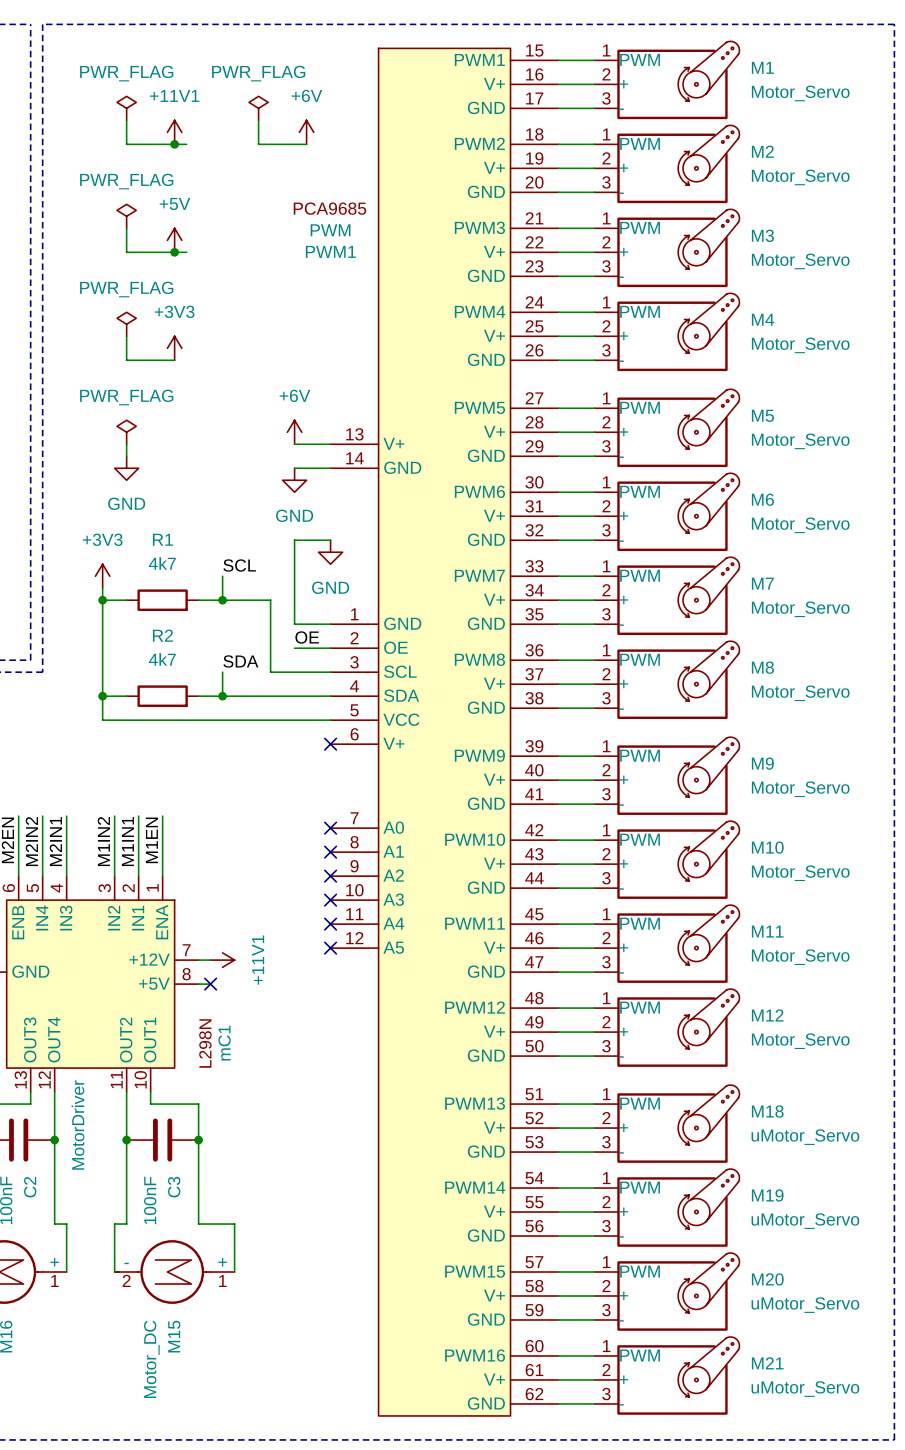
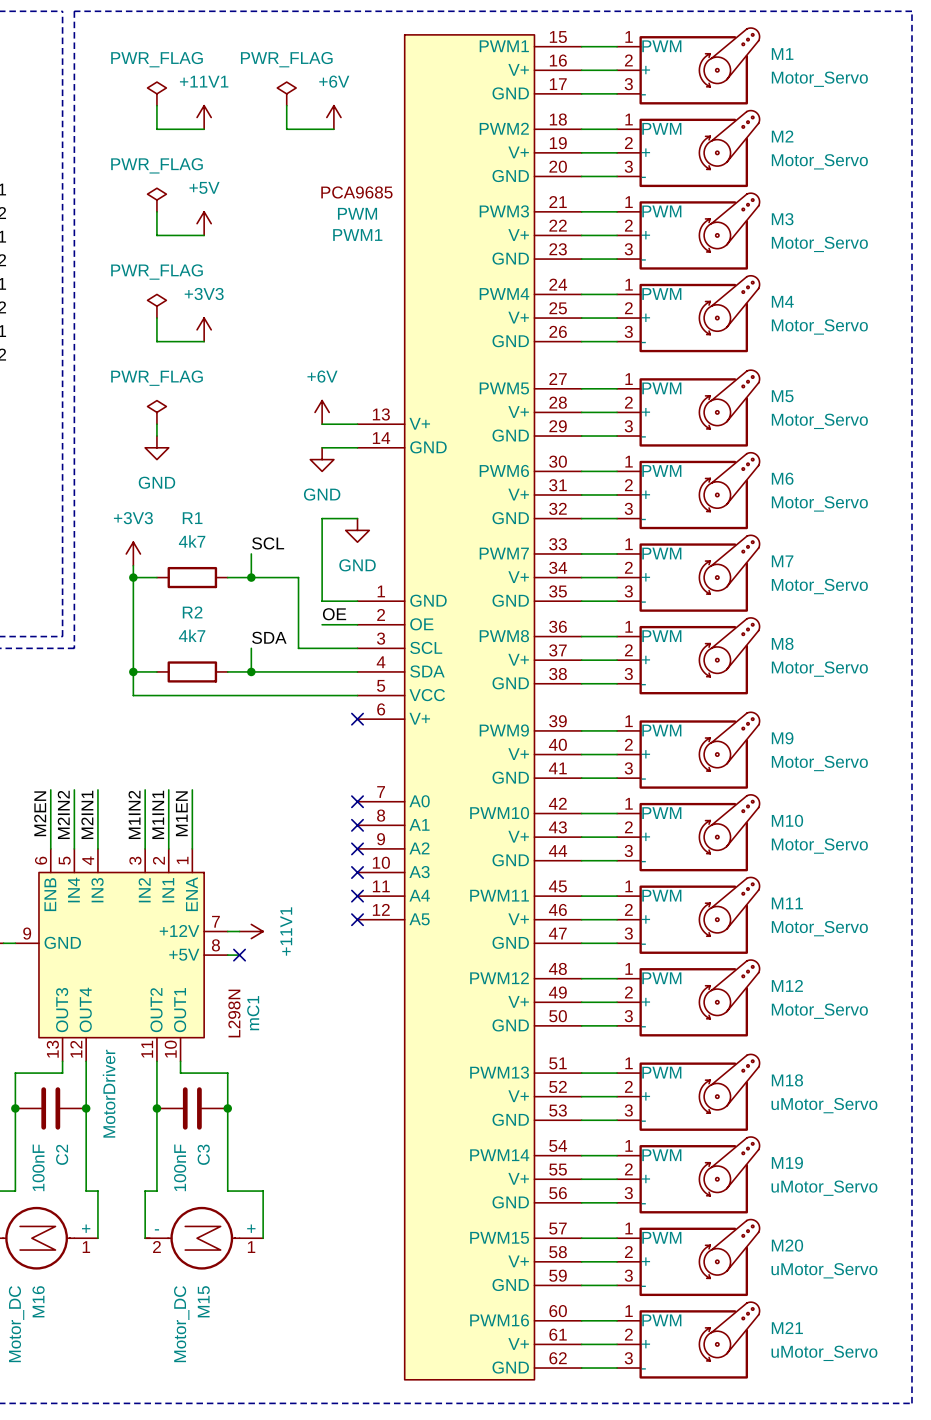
wire: (174, 144) (186, 144) -> none
junction: (174, 144) -> none
wire: (174, 252) (186, 252) -> none
junction: (174, 252) -> none

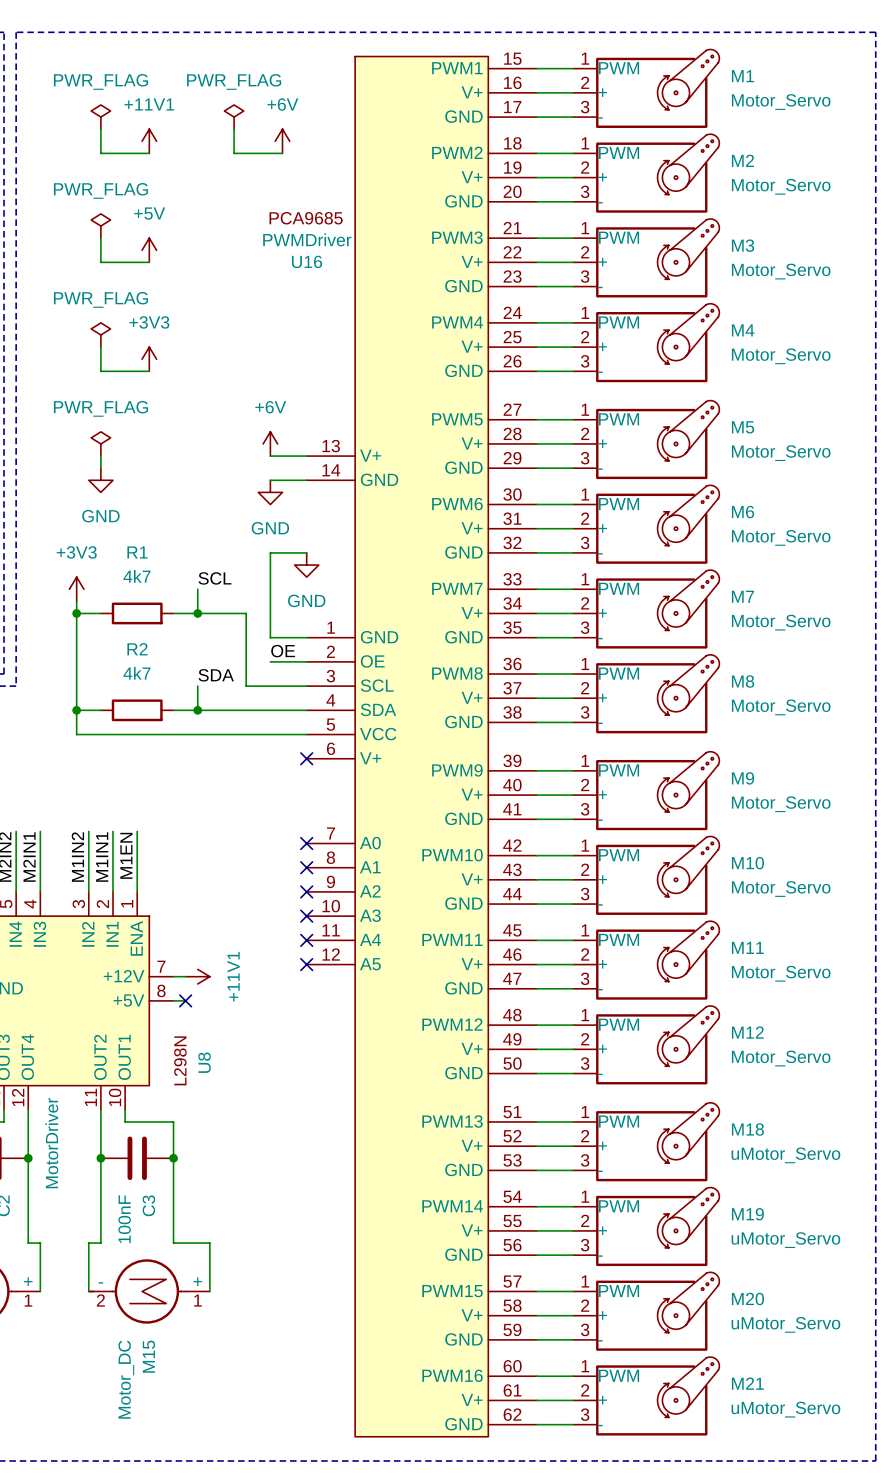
PWM1 value: PWM (357, 213) -> PWMDriver (307, 239)
PWM1 name: PWM1 (357, 235) -> U16 (307, 261)
mC1 name: mC1 (253, 1013) -> U8 (204, 1062)

